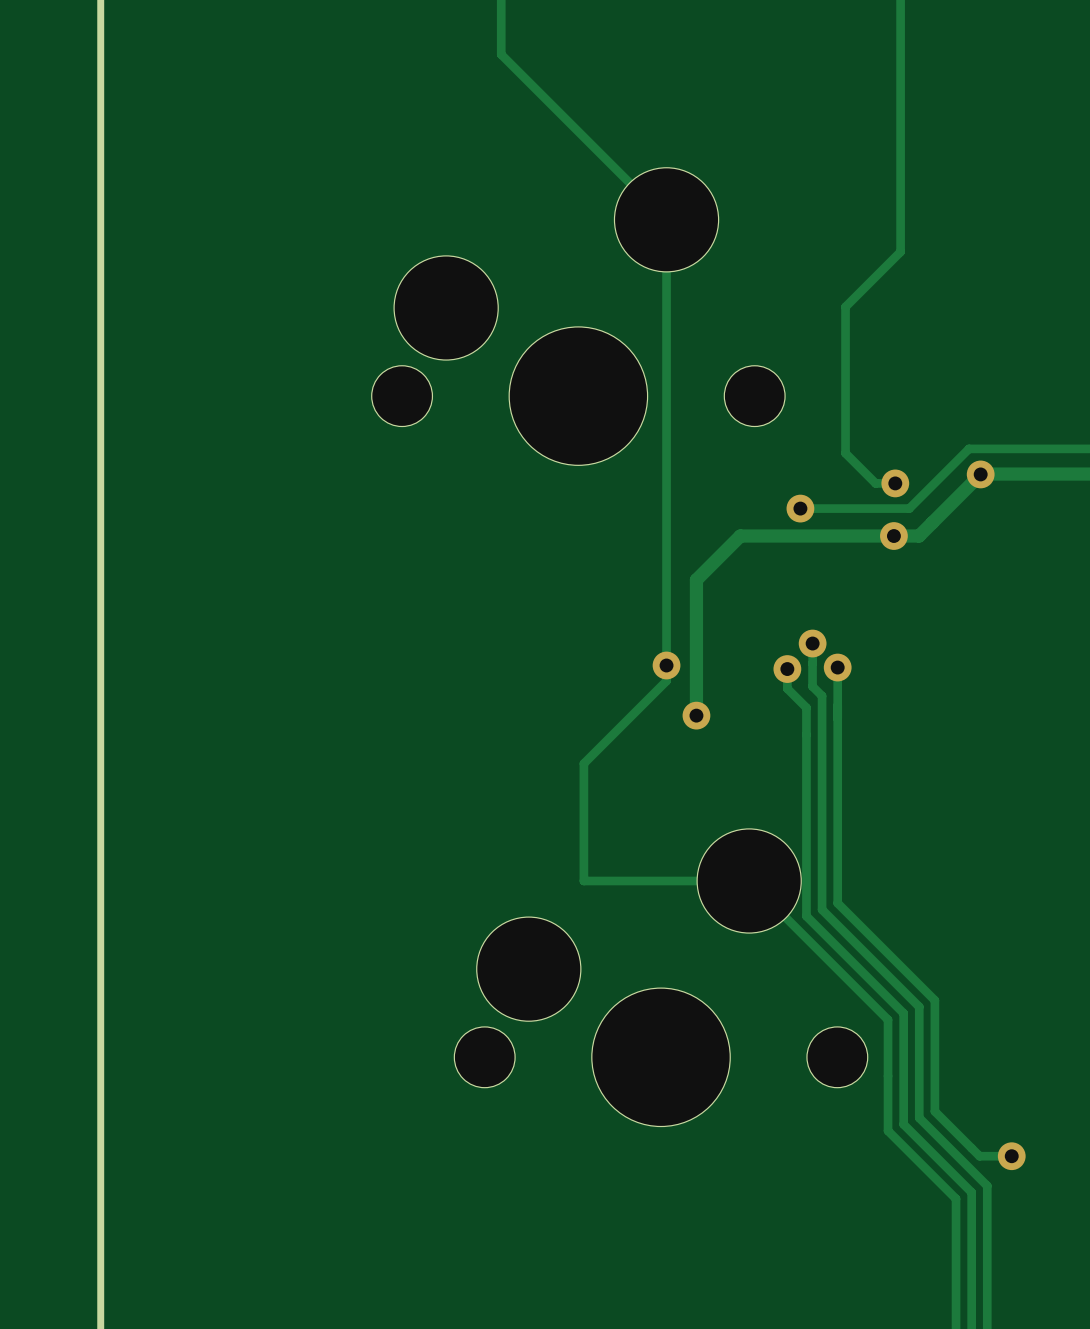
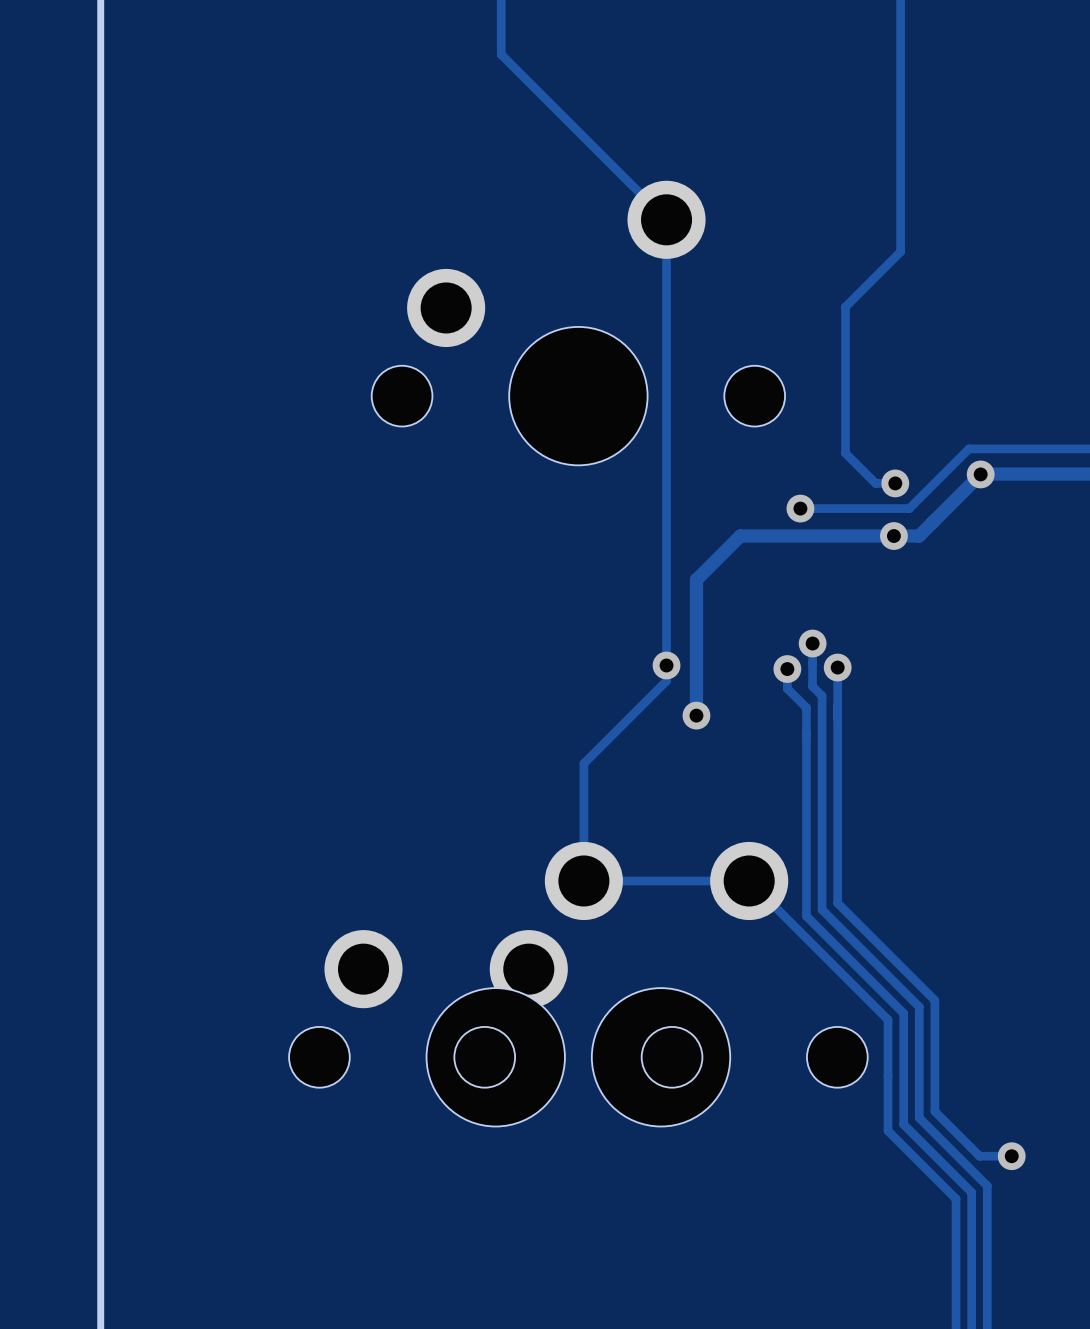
part footprint: [371, 167, 786, 466] -> [371, 180, 786, 466]
part footprint: [454, 828, 868, 1127] -> [454, 841, 868, 1127]
part: none -> (495, 984)

